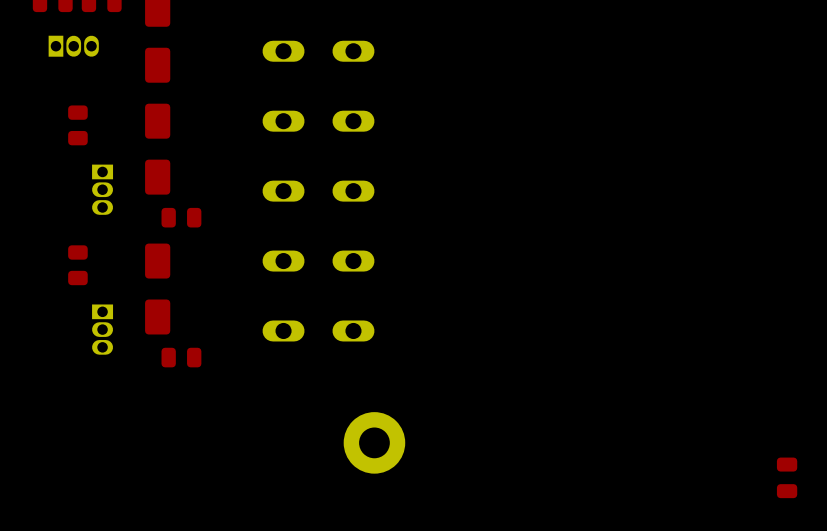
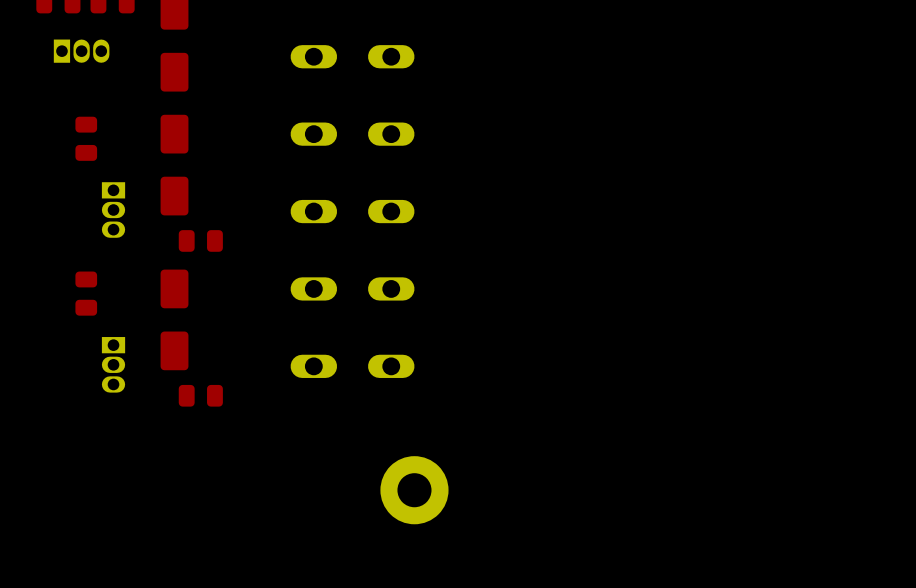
part: (787, 477) -> none

